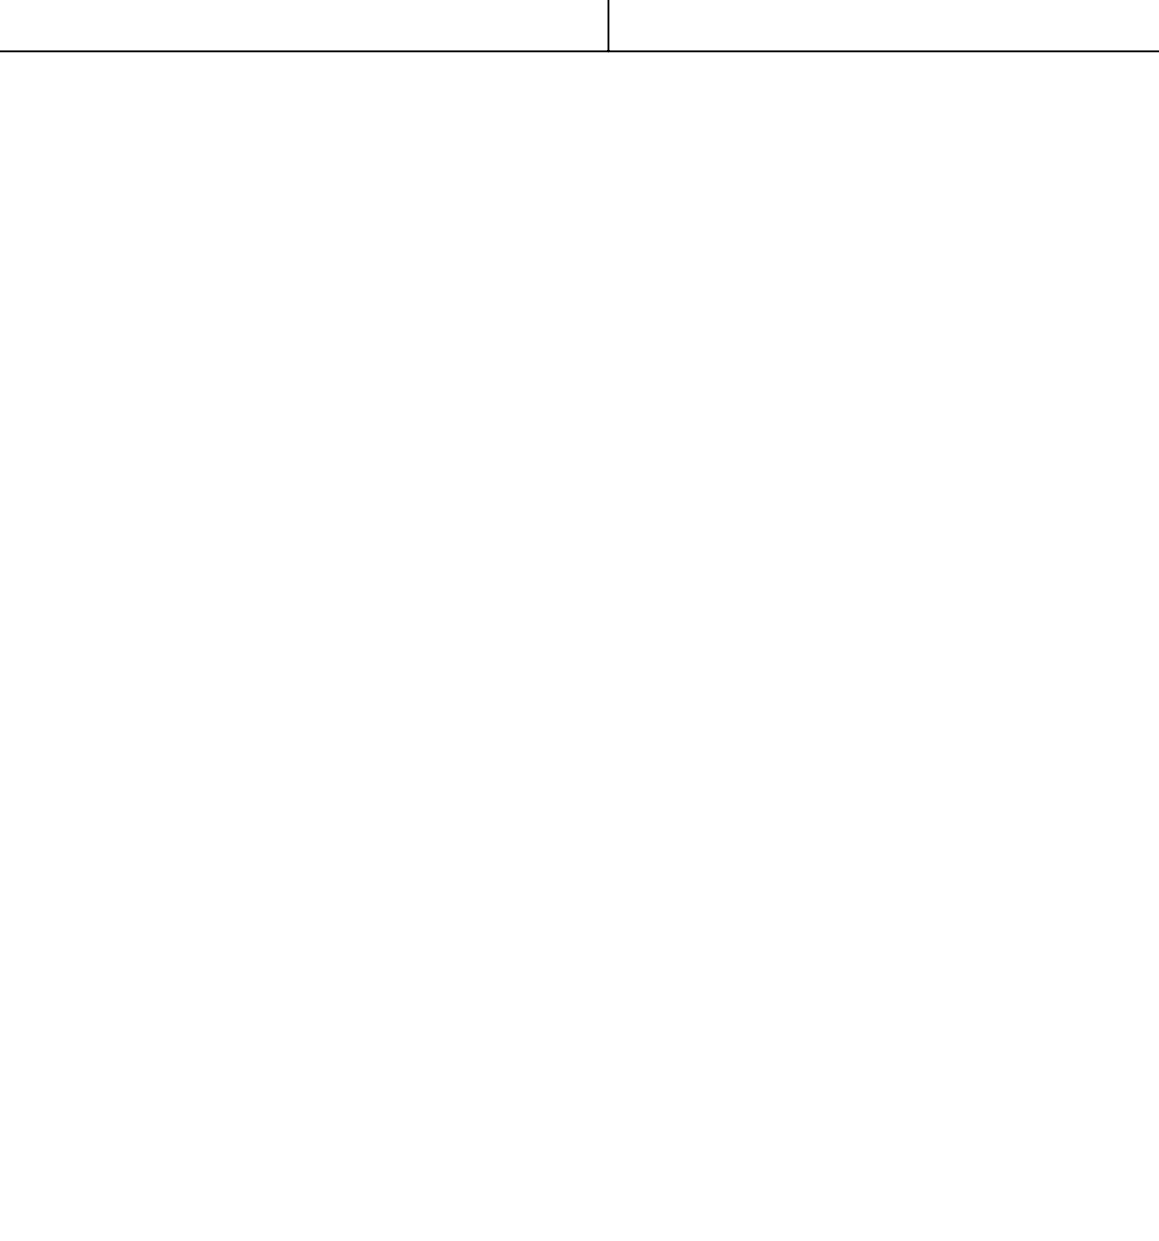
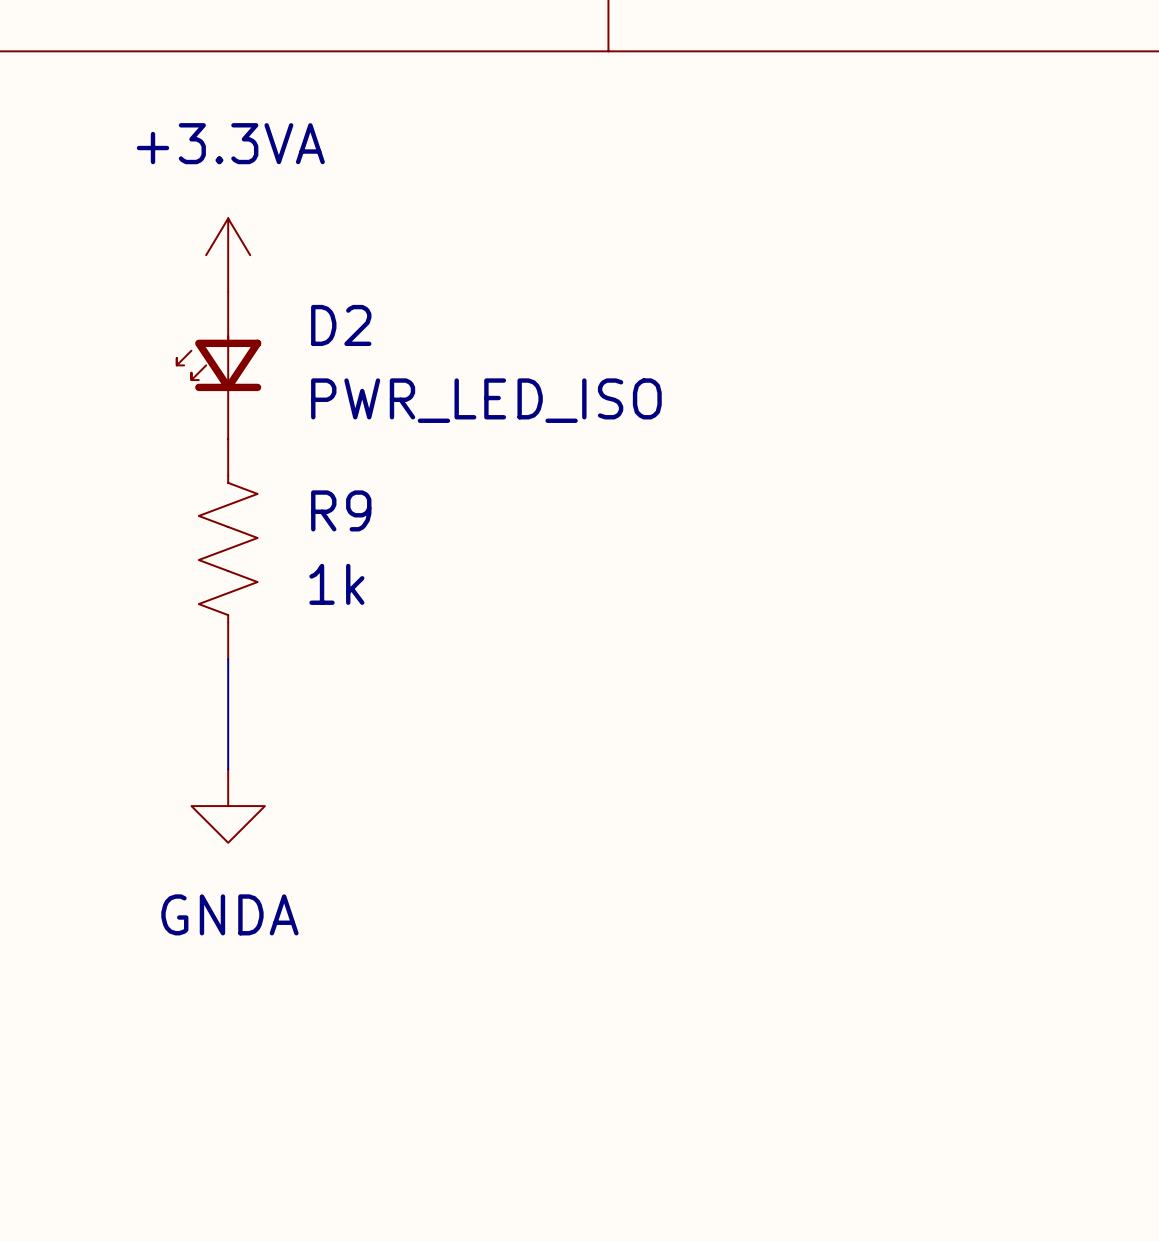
power symbol: none -> +3.3VA (228, 255)
D2: none -> PWR_LED_ISO (219, 365)
R9: none -> 1k (228, 549)
wire: none -> (228, 659) (228, 769)
power symbol: none -> GNDA (228, 806)

